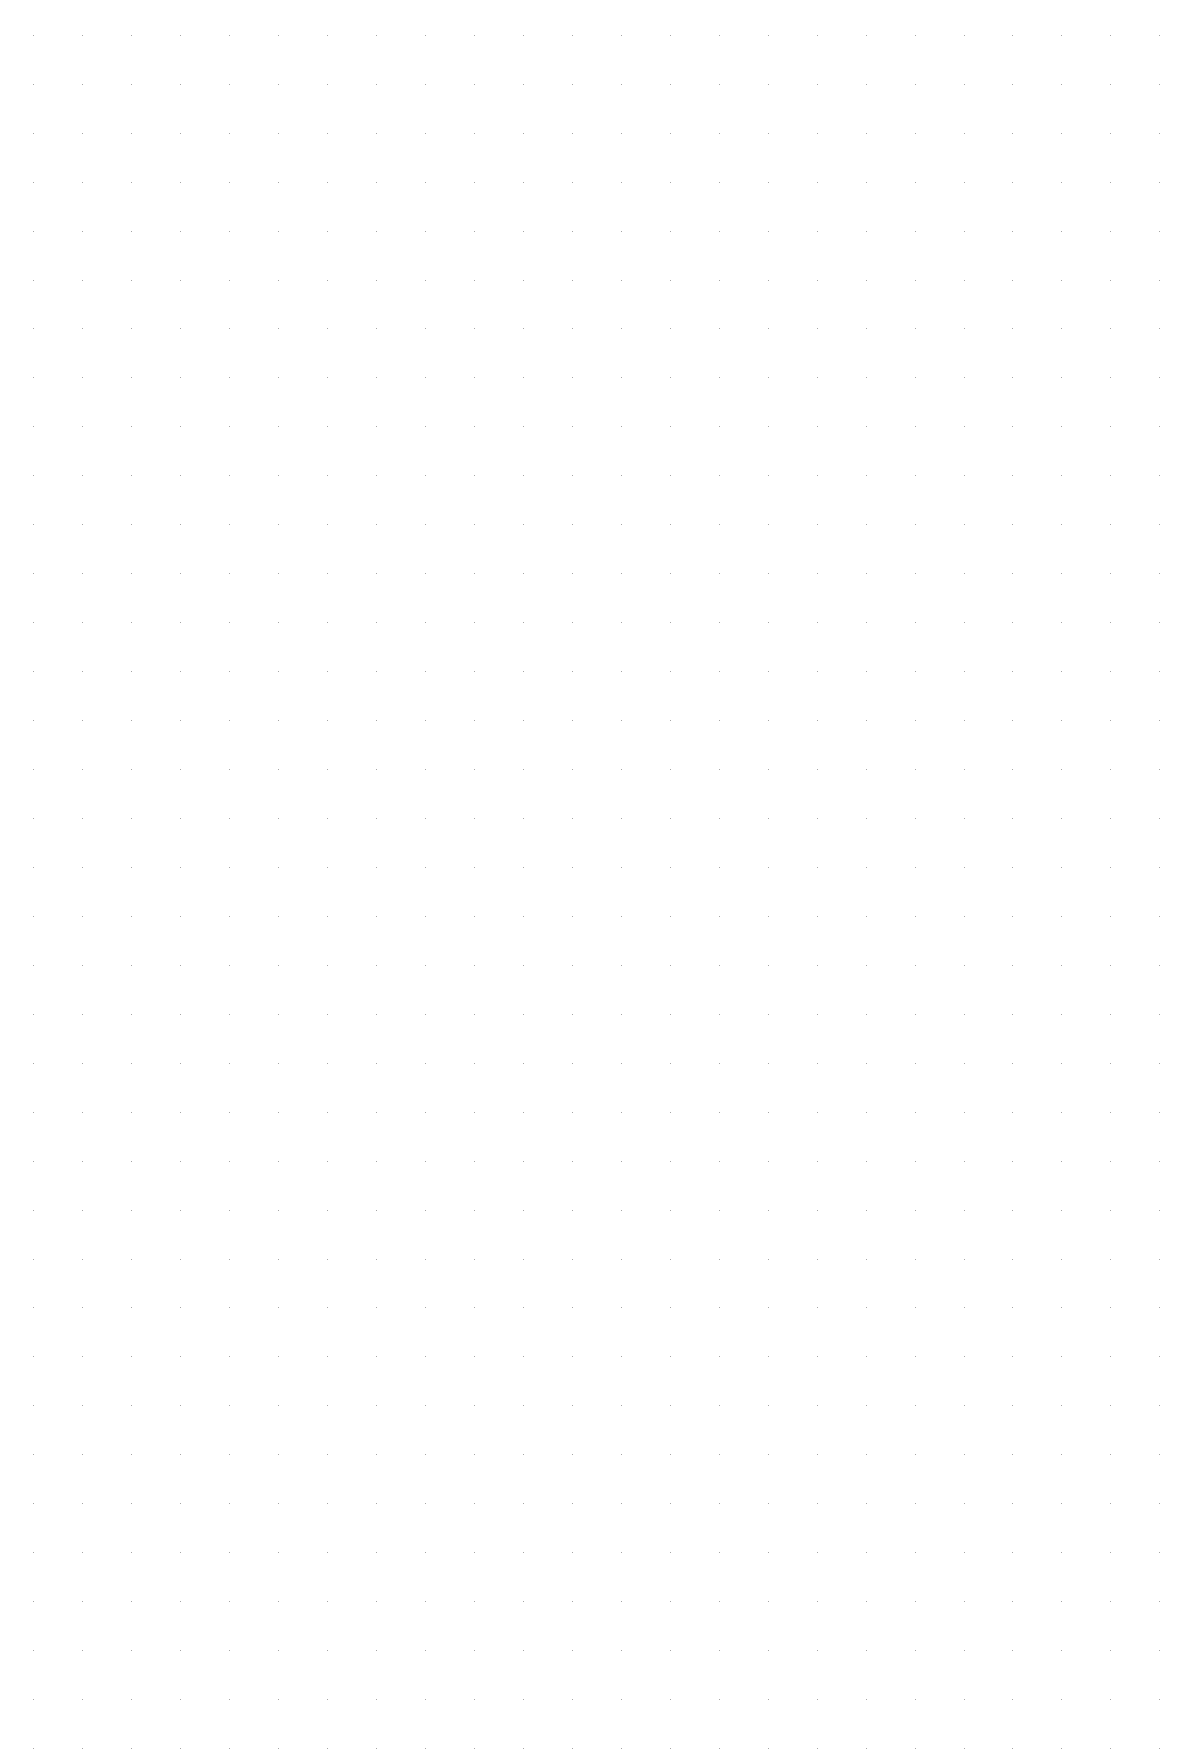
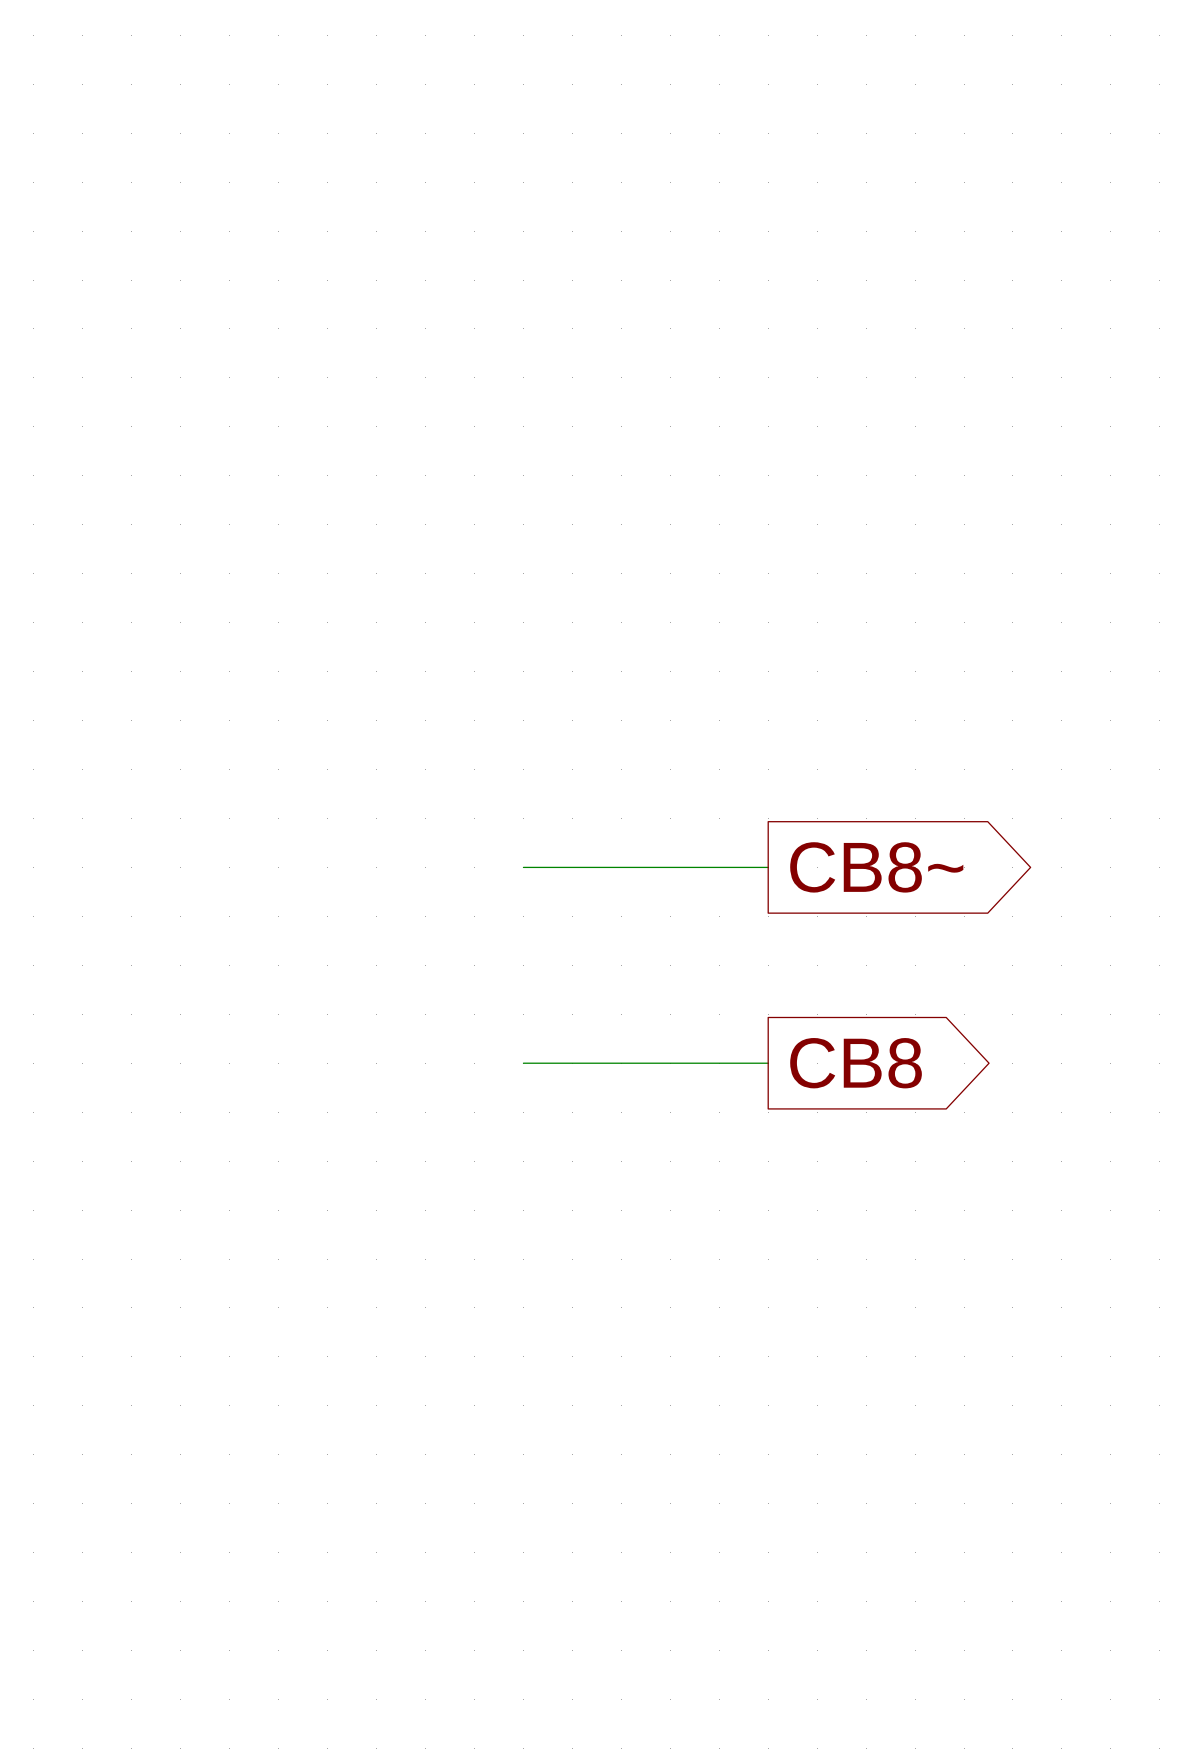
wire: none -> (523, 867) (768, 867)
global label: none -> CB8~ (876, 867)
wire: none -> (523, 1063) (768, 1063)
global label: none -> CB8 (856, 1063)

